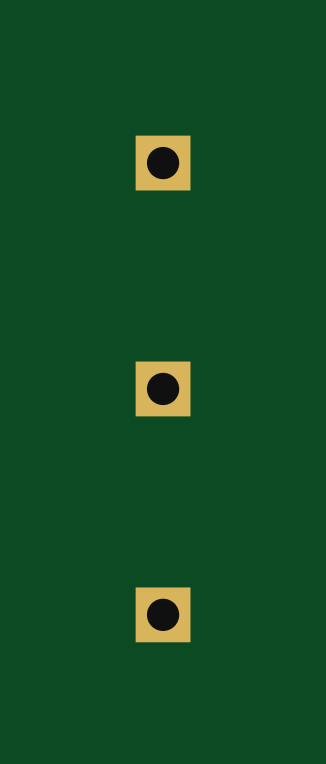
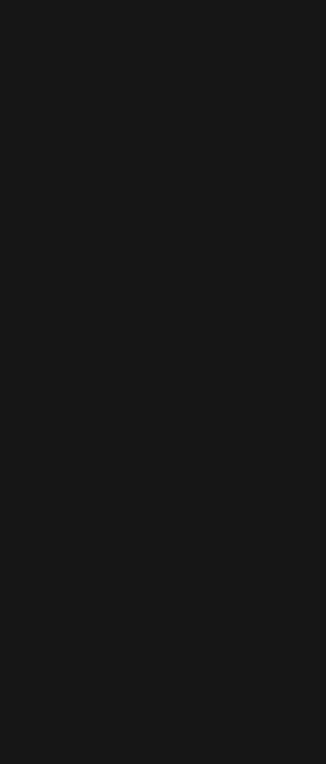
part: (163, 163) -> none
part: (163, 388) -> none
part: (163, 614) -> none

